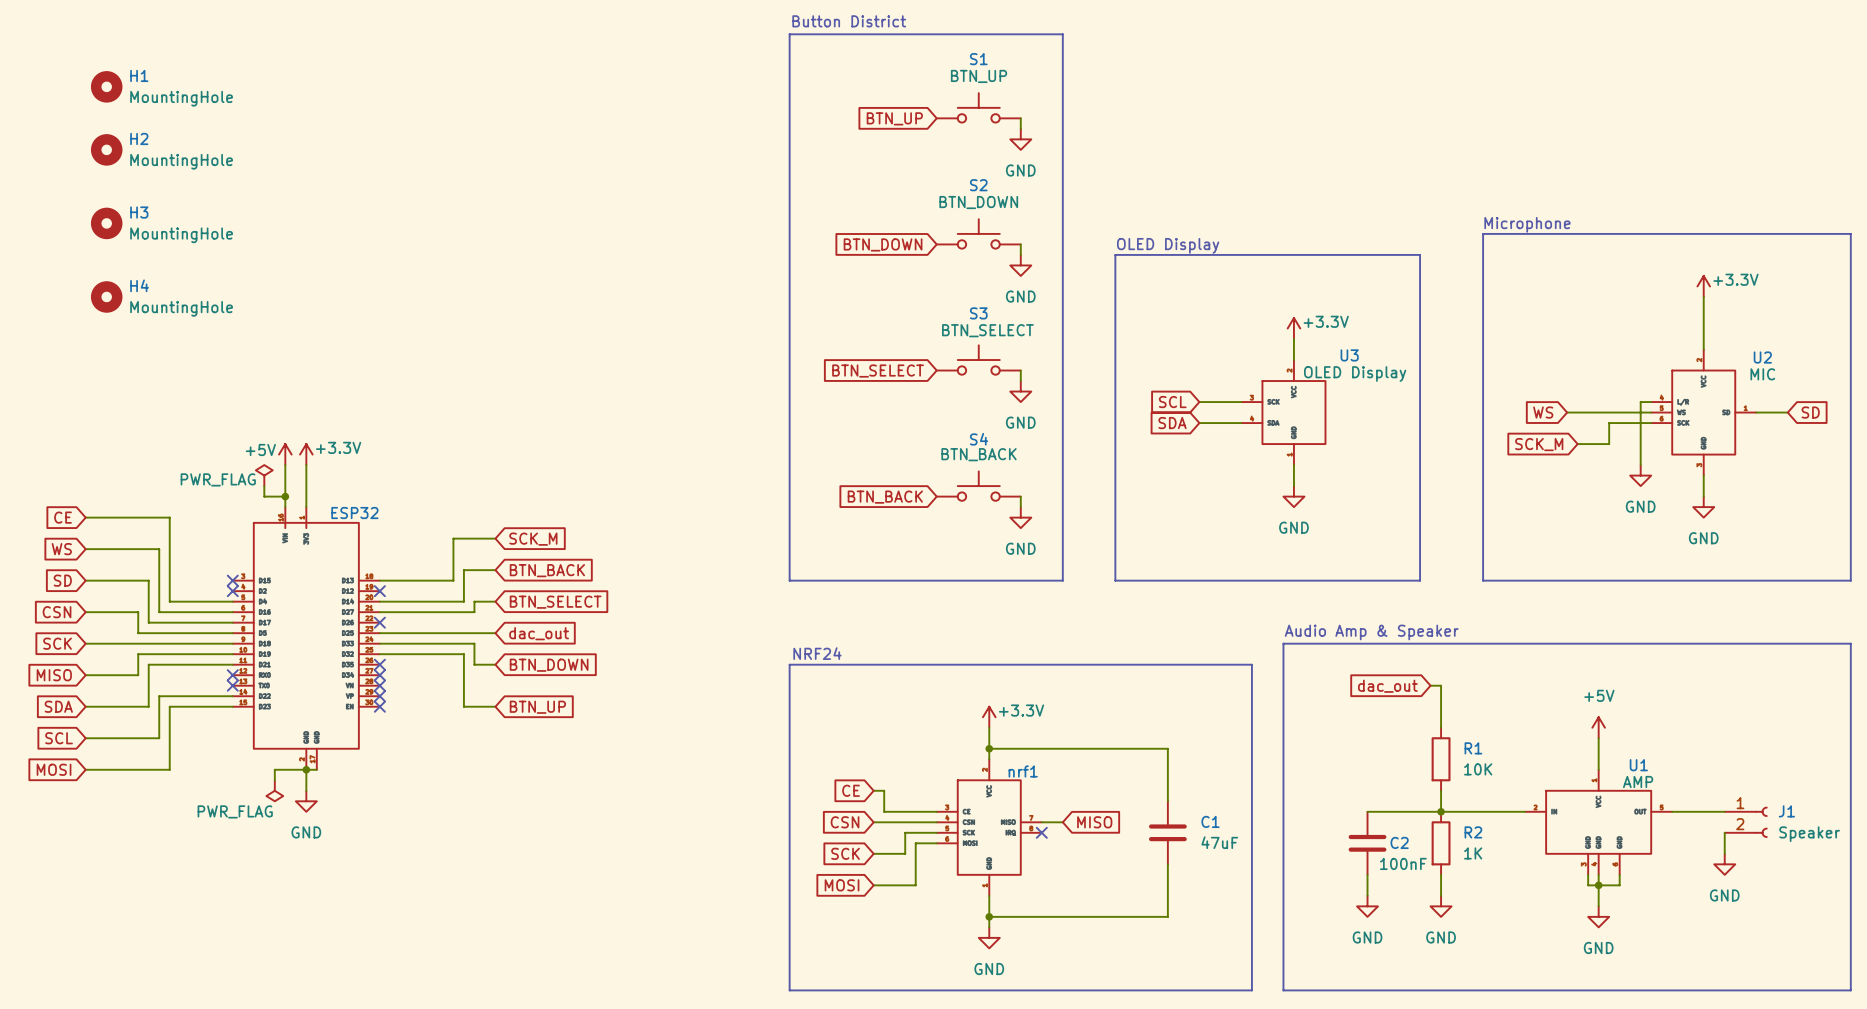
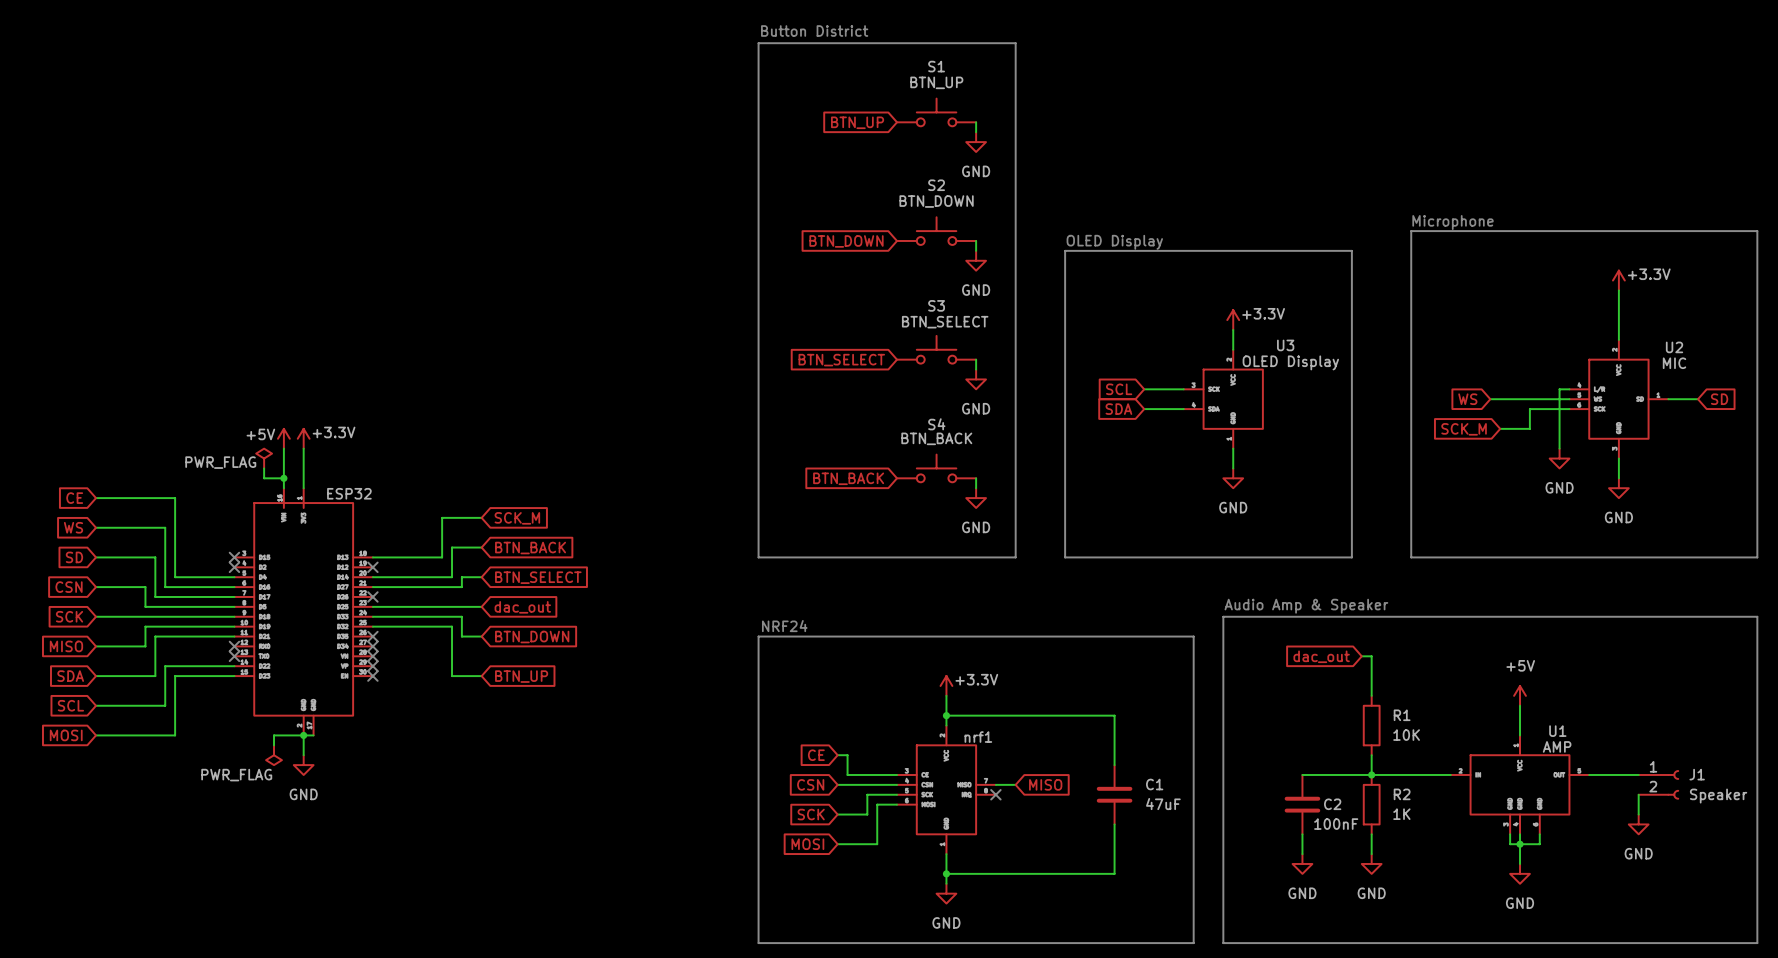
H1: MountingHole (106, 86) -> none
H2: MountingHole (106, 149) -> none
H3: MountingHole (106, 223) -> none
H4: MountingHole (106, 296) -> none

